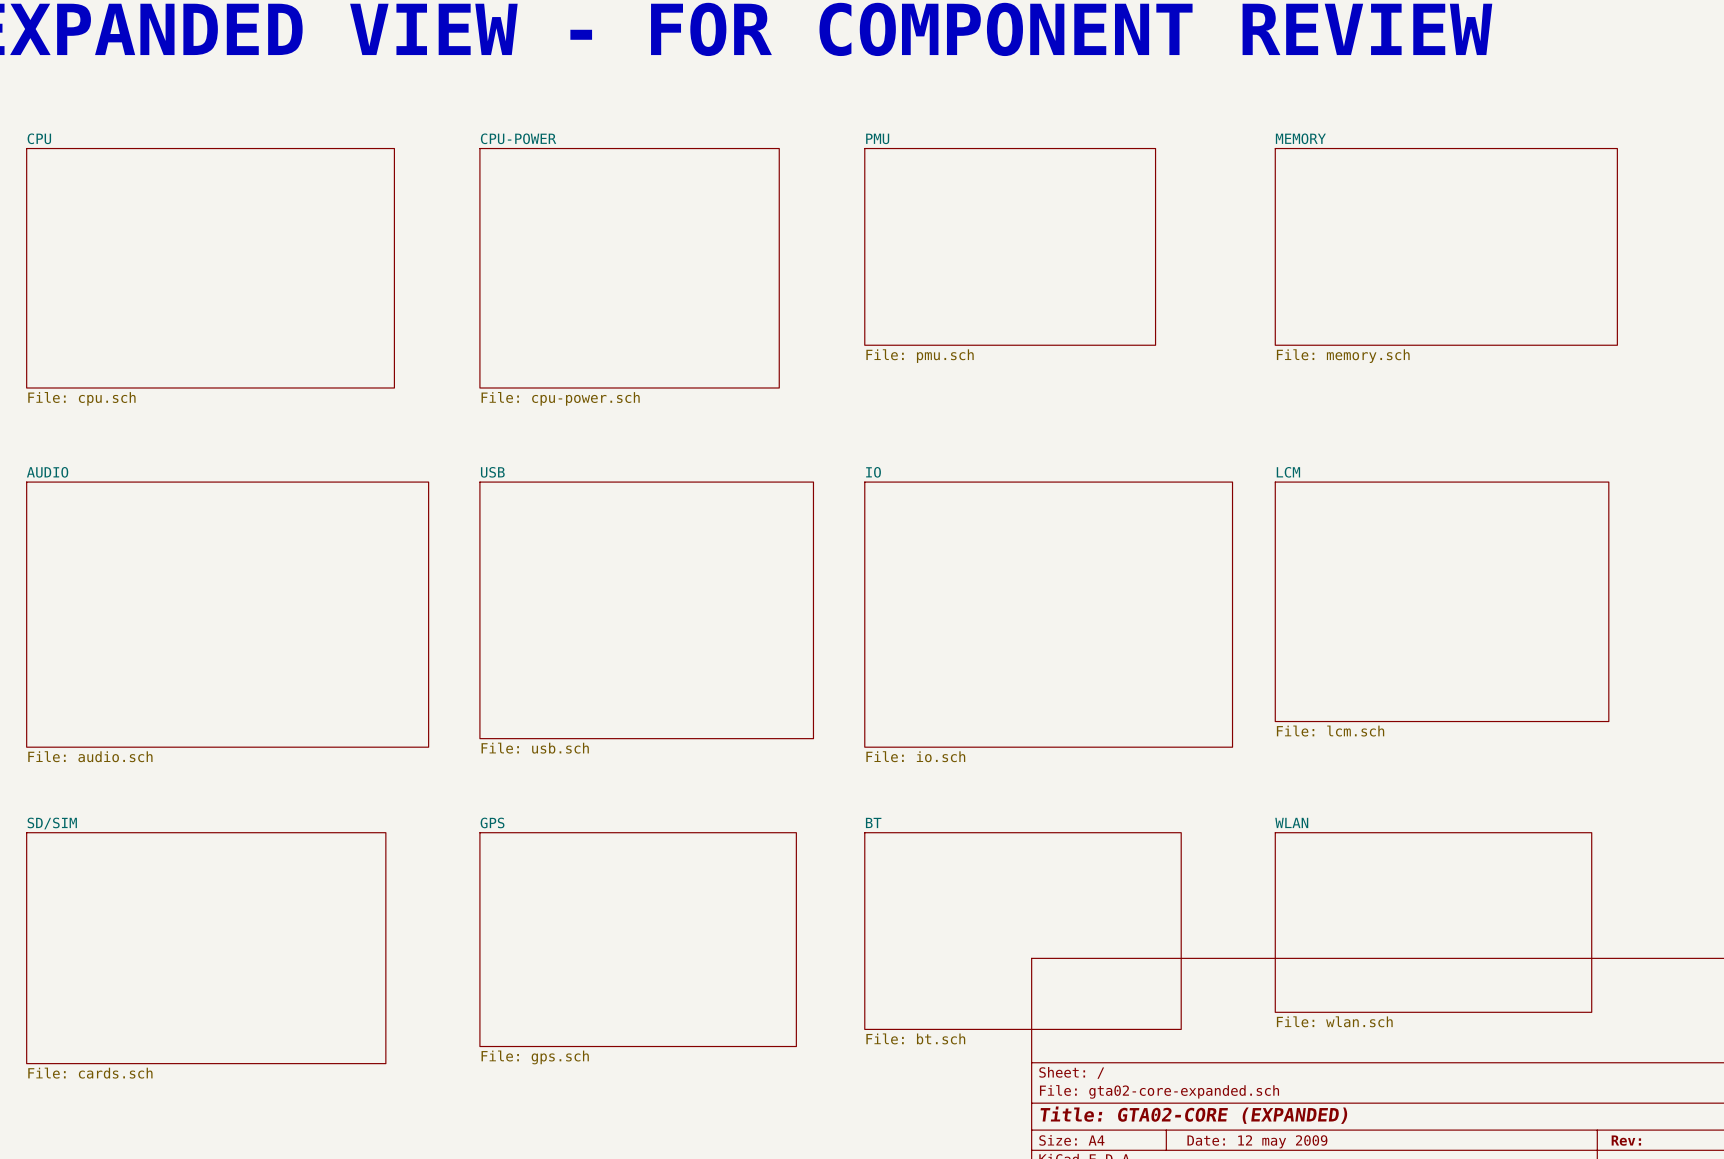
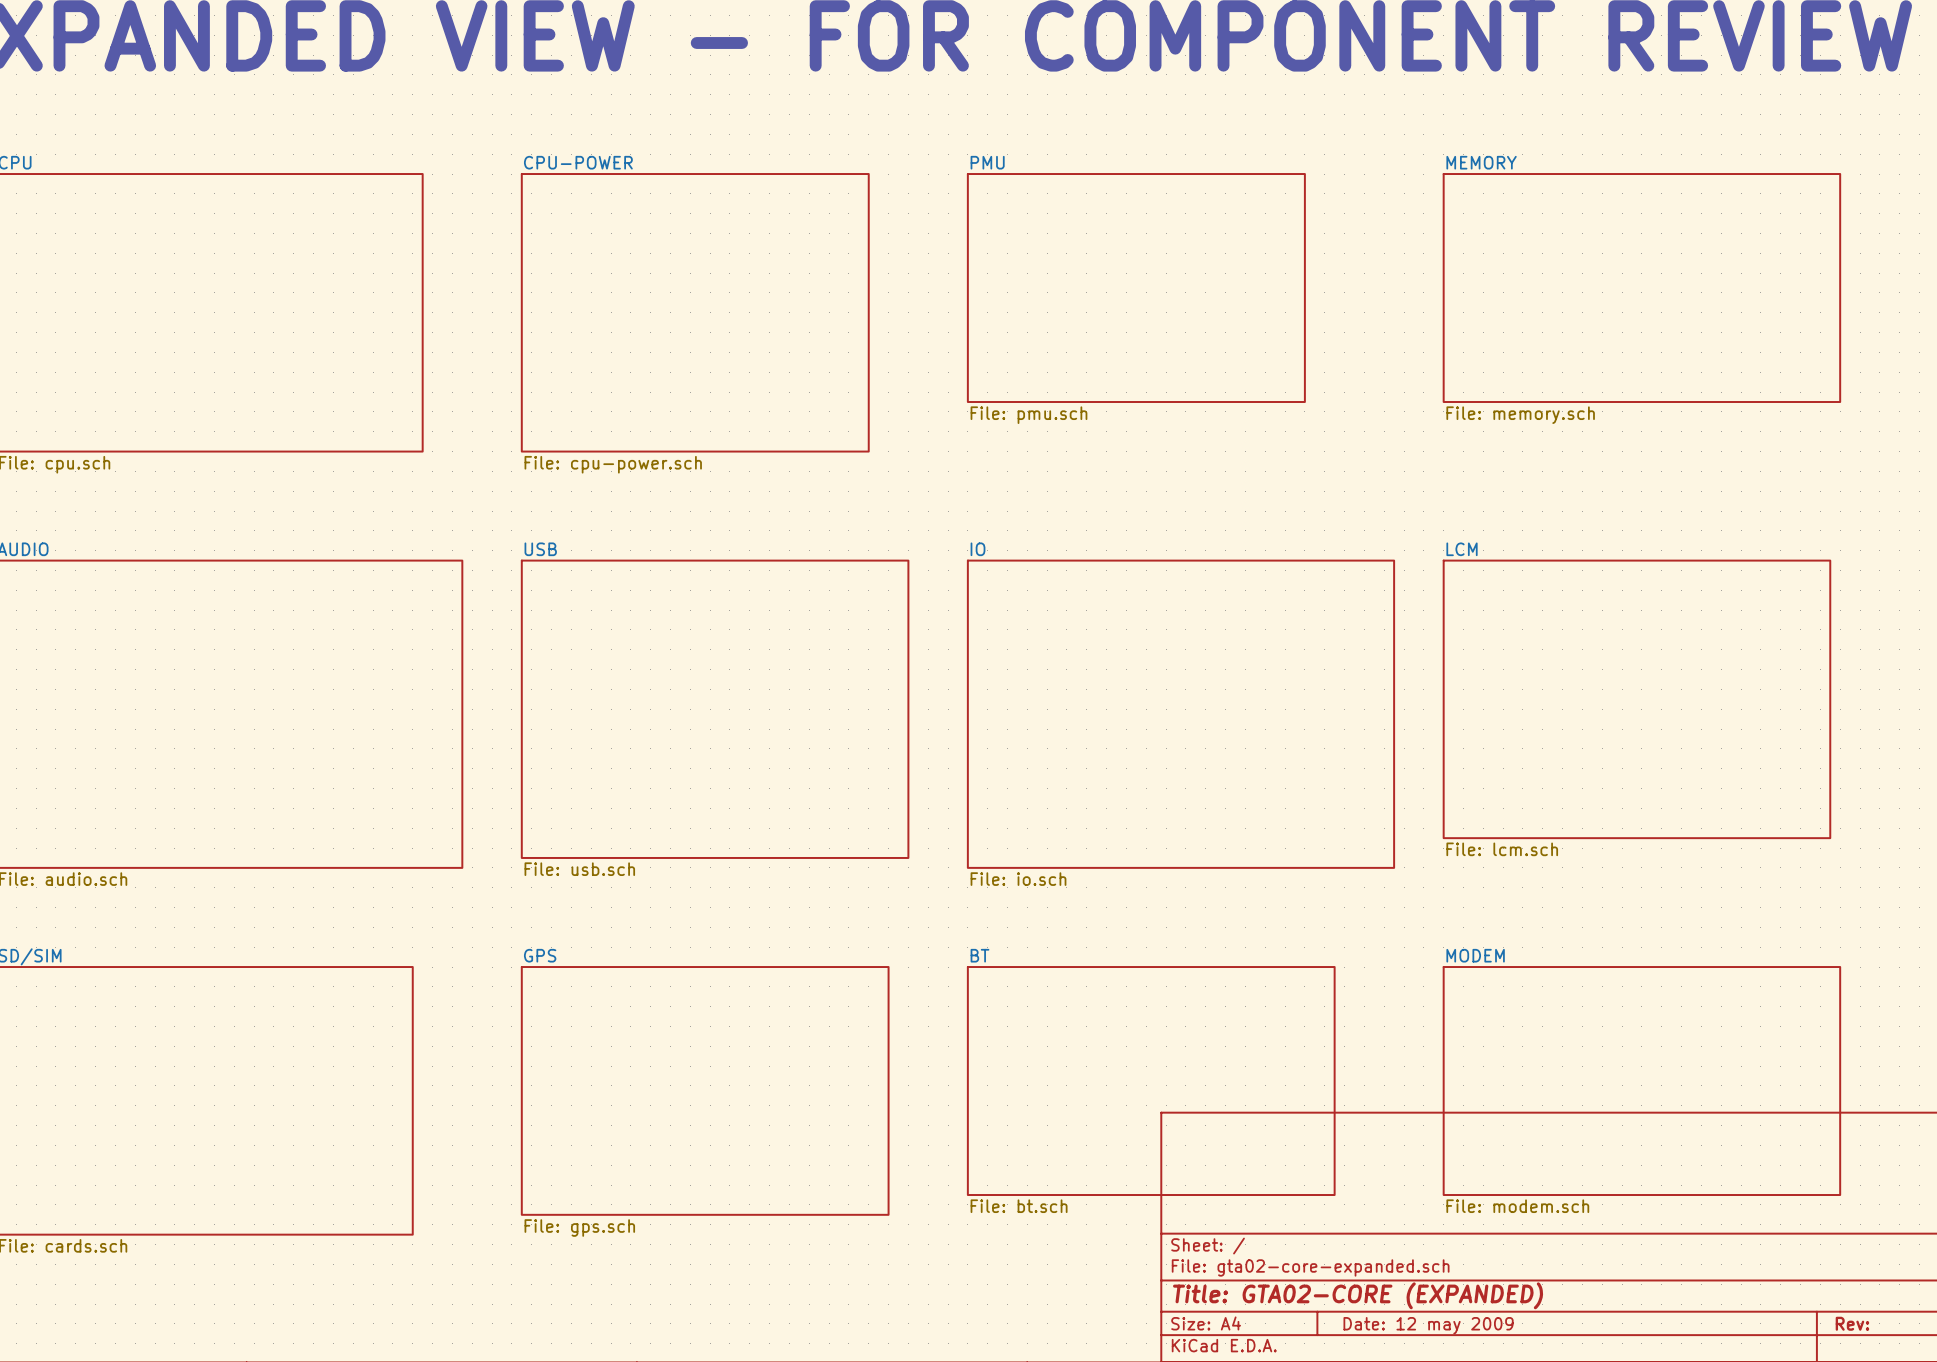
sheet WLAN: File: wlan.sch (1433, 922) -> none
sheet MODEM: none -> File: modem.sch (1641, 1081)

